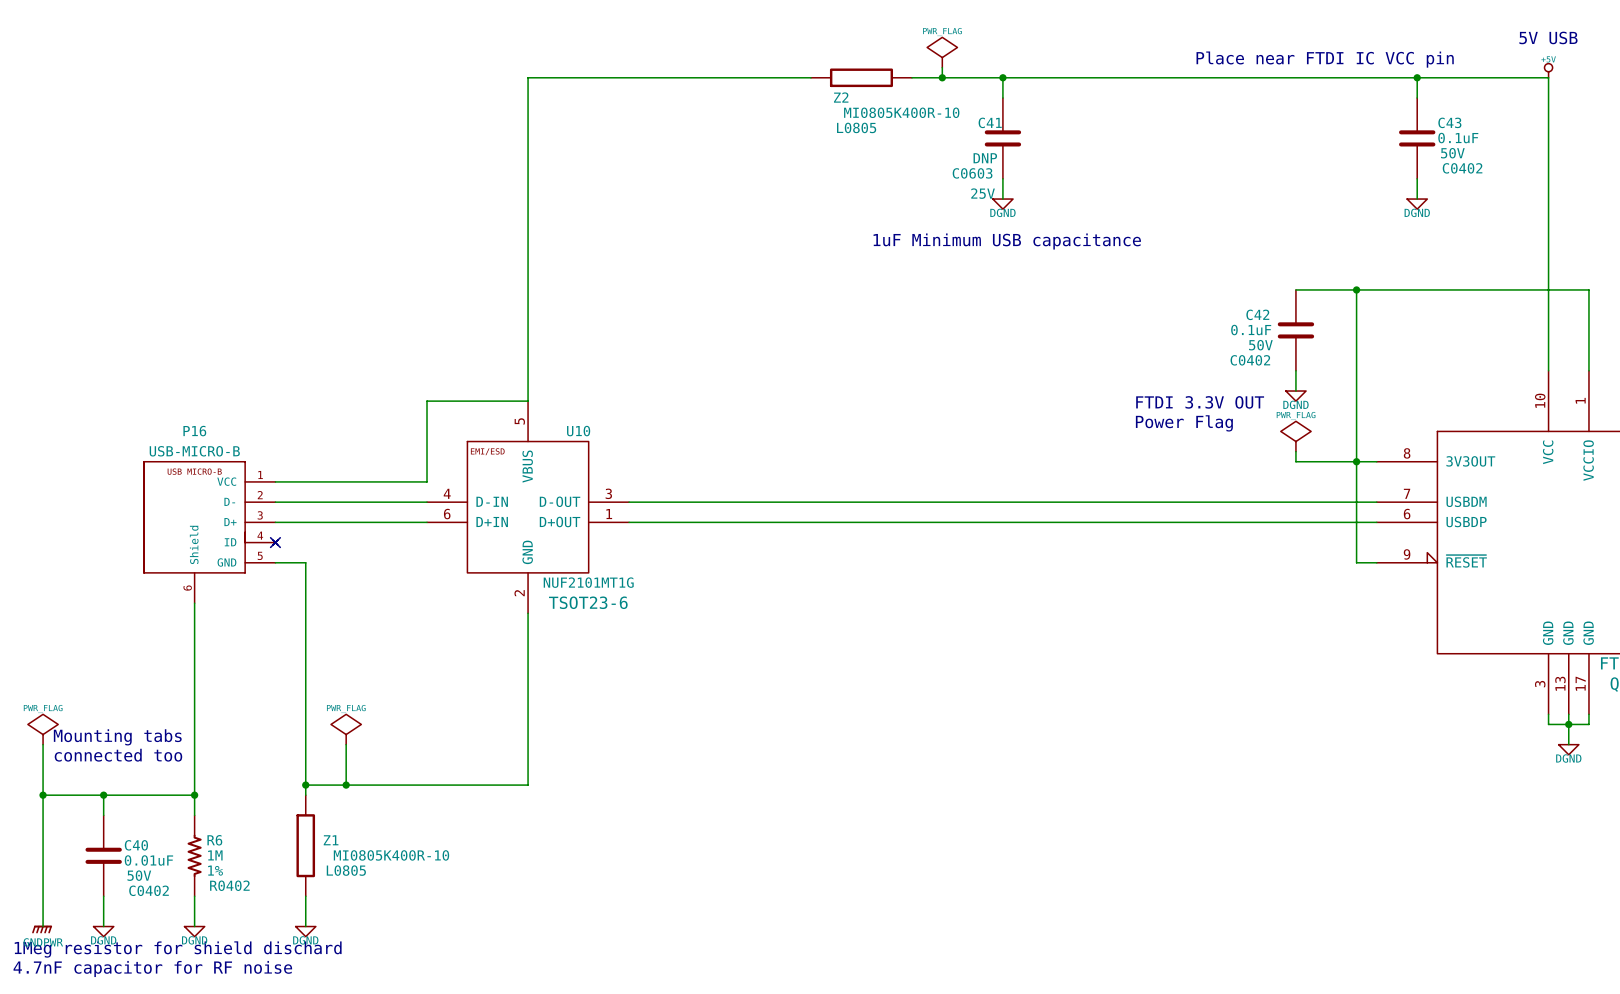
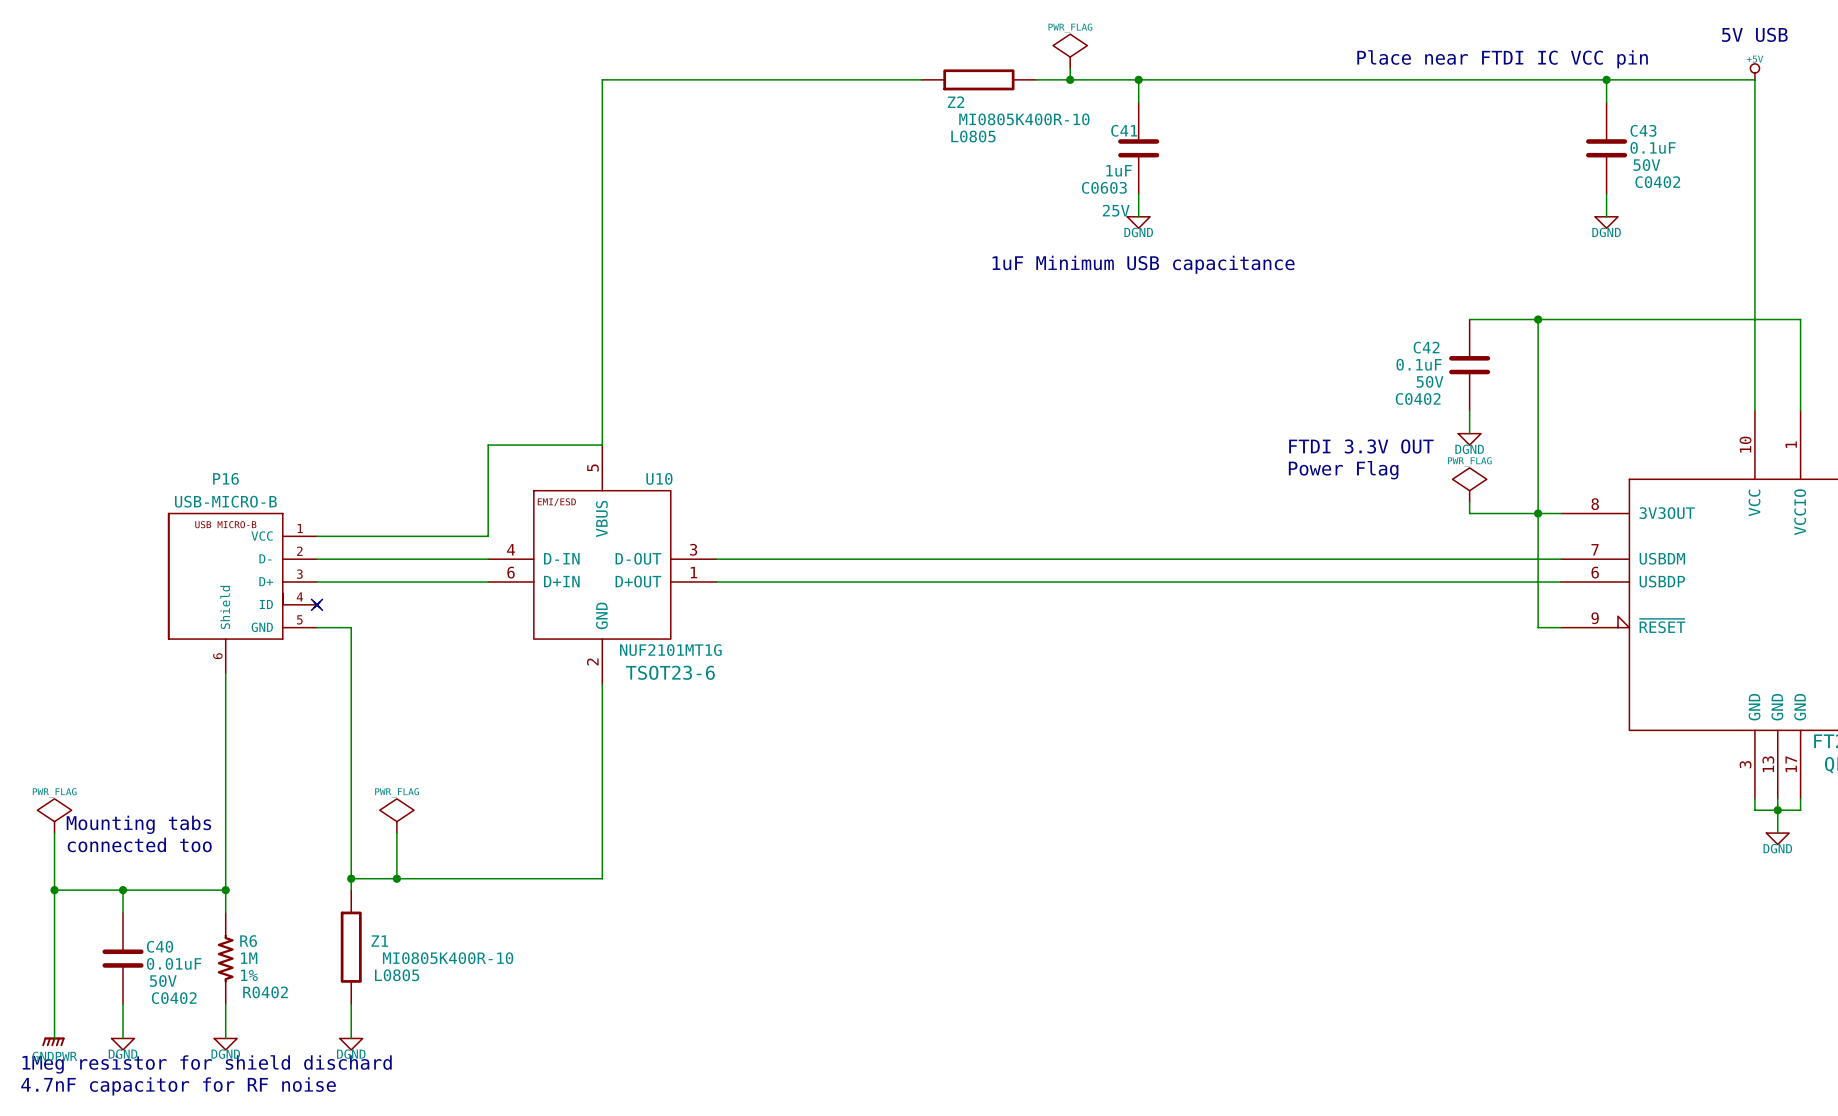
C41 value: DNP (985, 158) -> 1uF (1119, 170)

